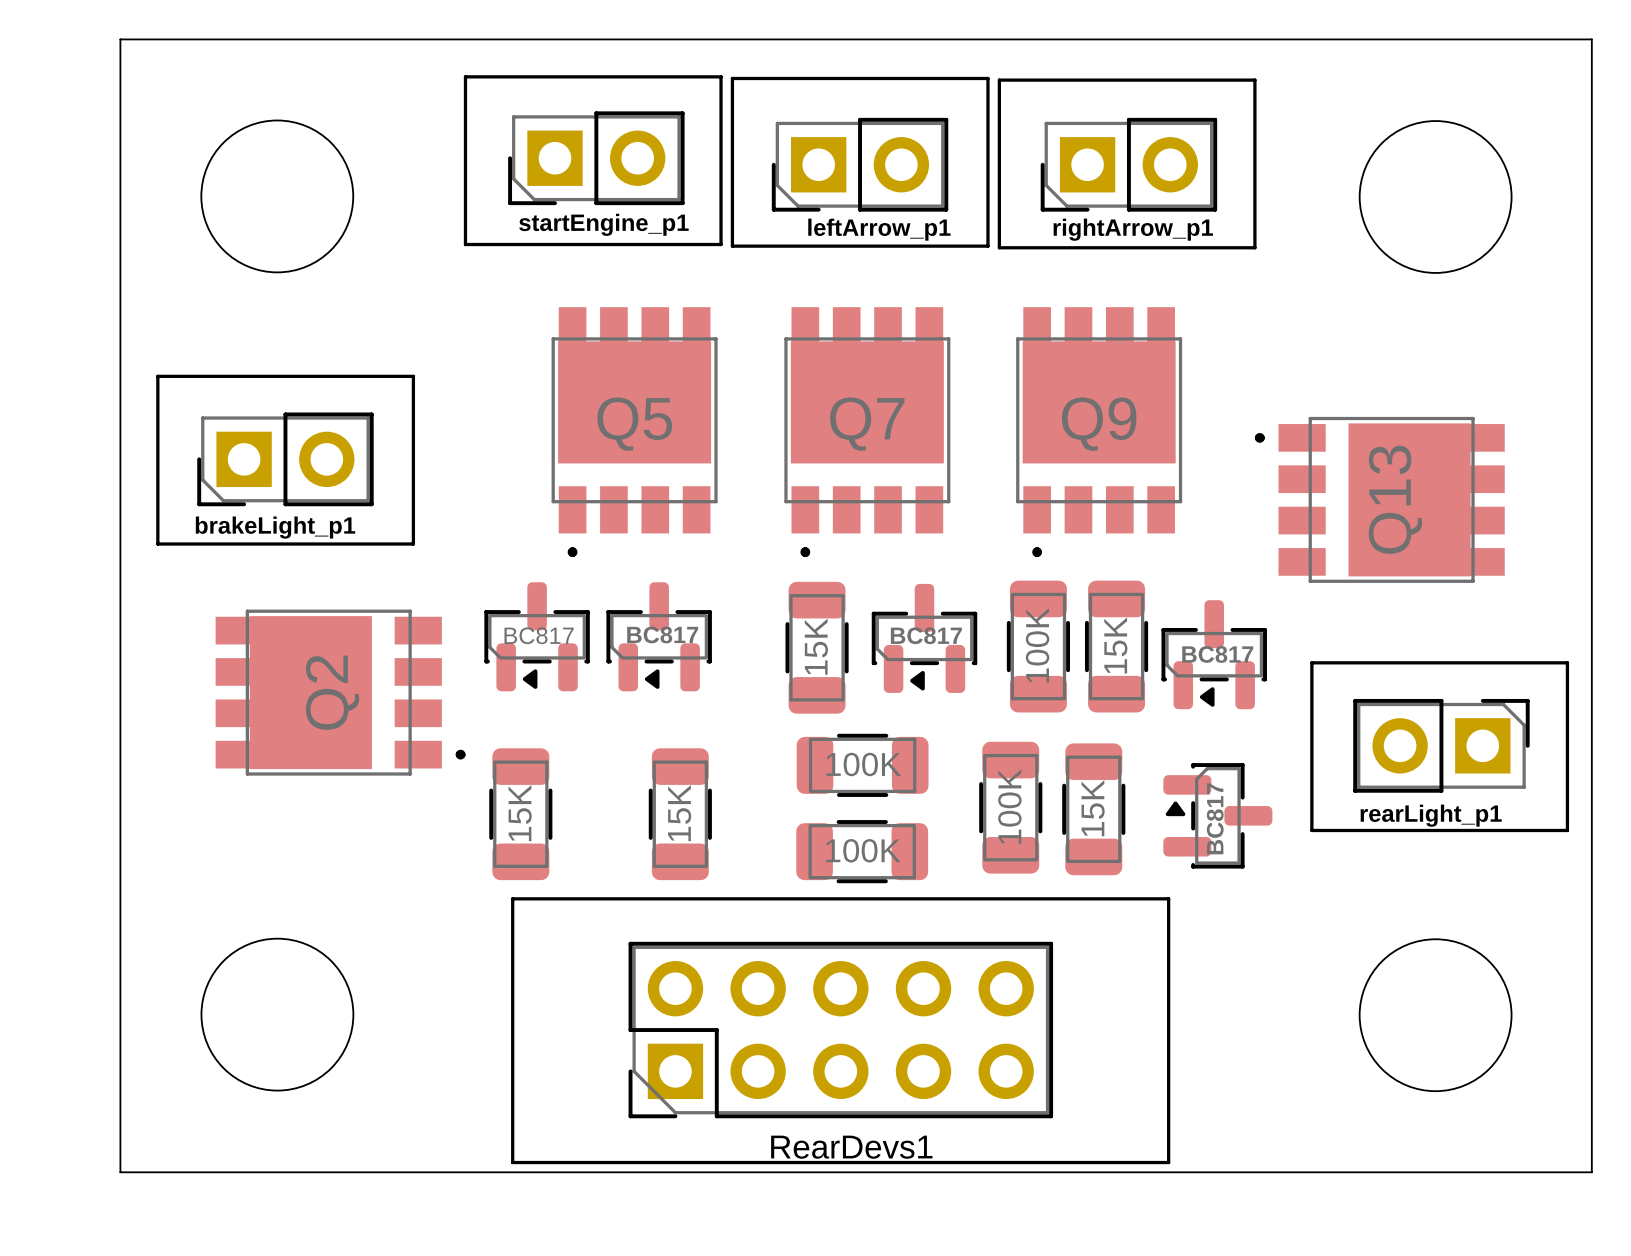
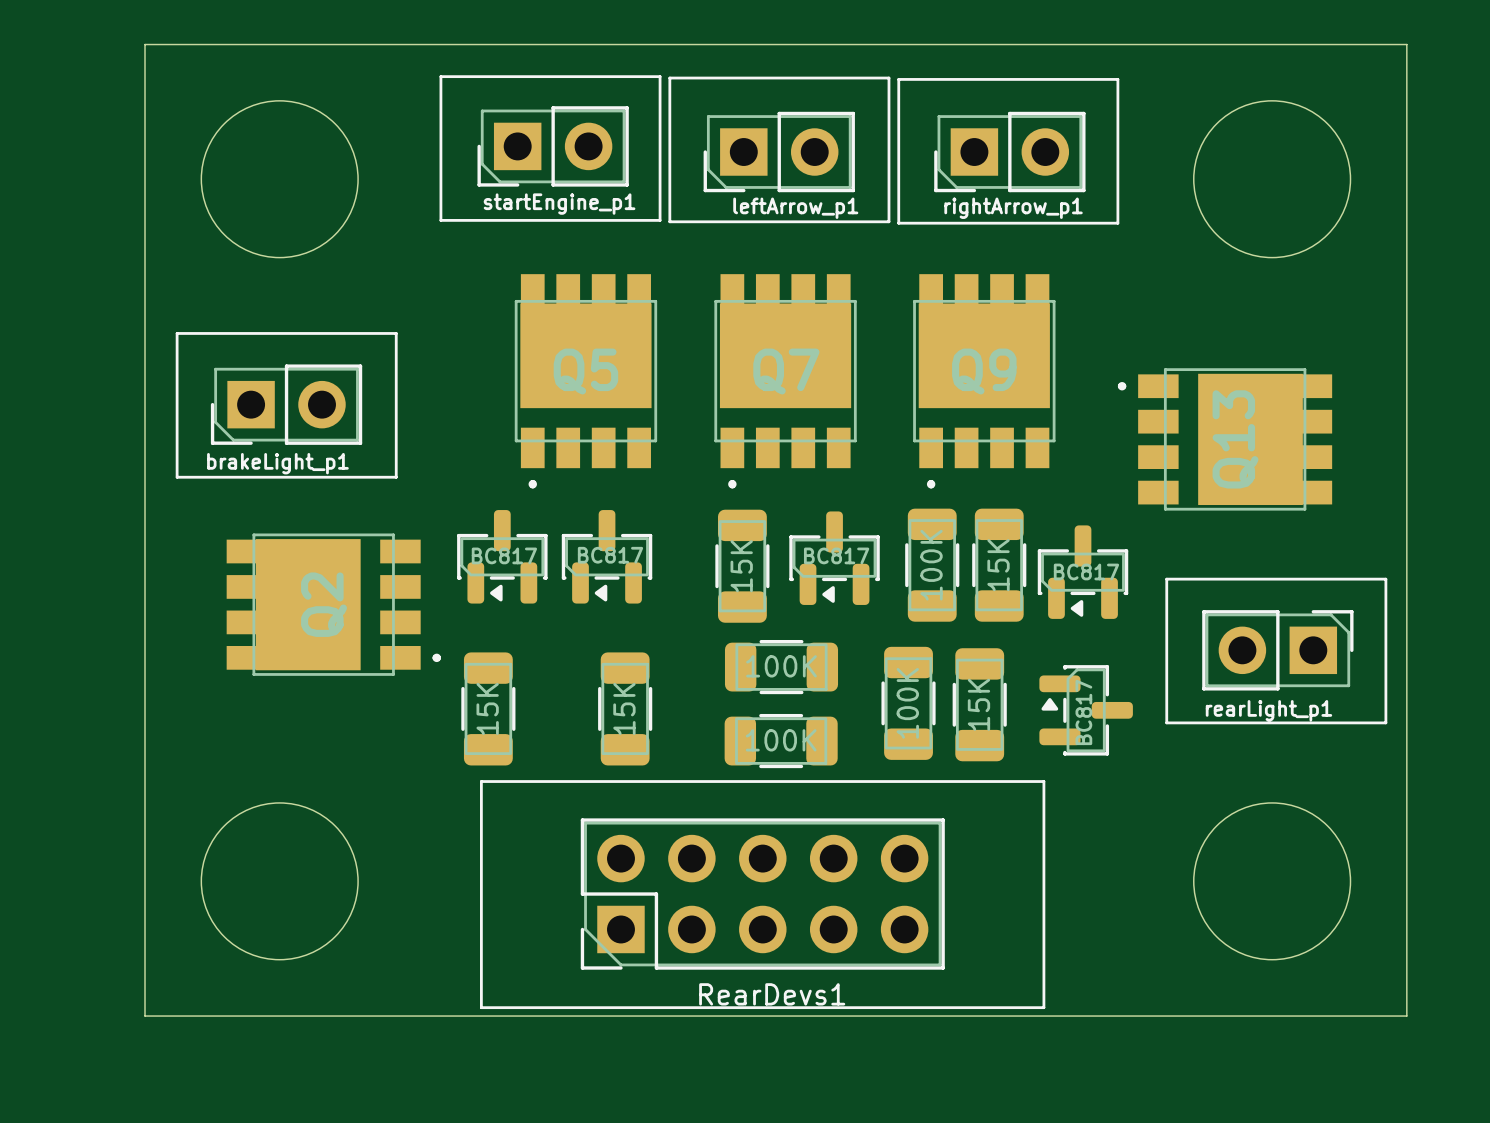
round board edge size: [200, 119, 355, 274] -> [200, 100, 359, 259]
round board edge size: [1358, 120, 1513, 274] -> [1193, 100, 1352, 259]
round board edge size: [200, 937, 355, 1092] -> [200, 802, 359, 961]
round board edge size: [1358, 938, 1513, 1092] -> [1193, 802, 1352, 961]

